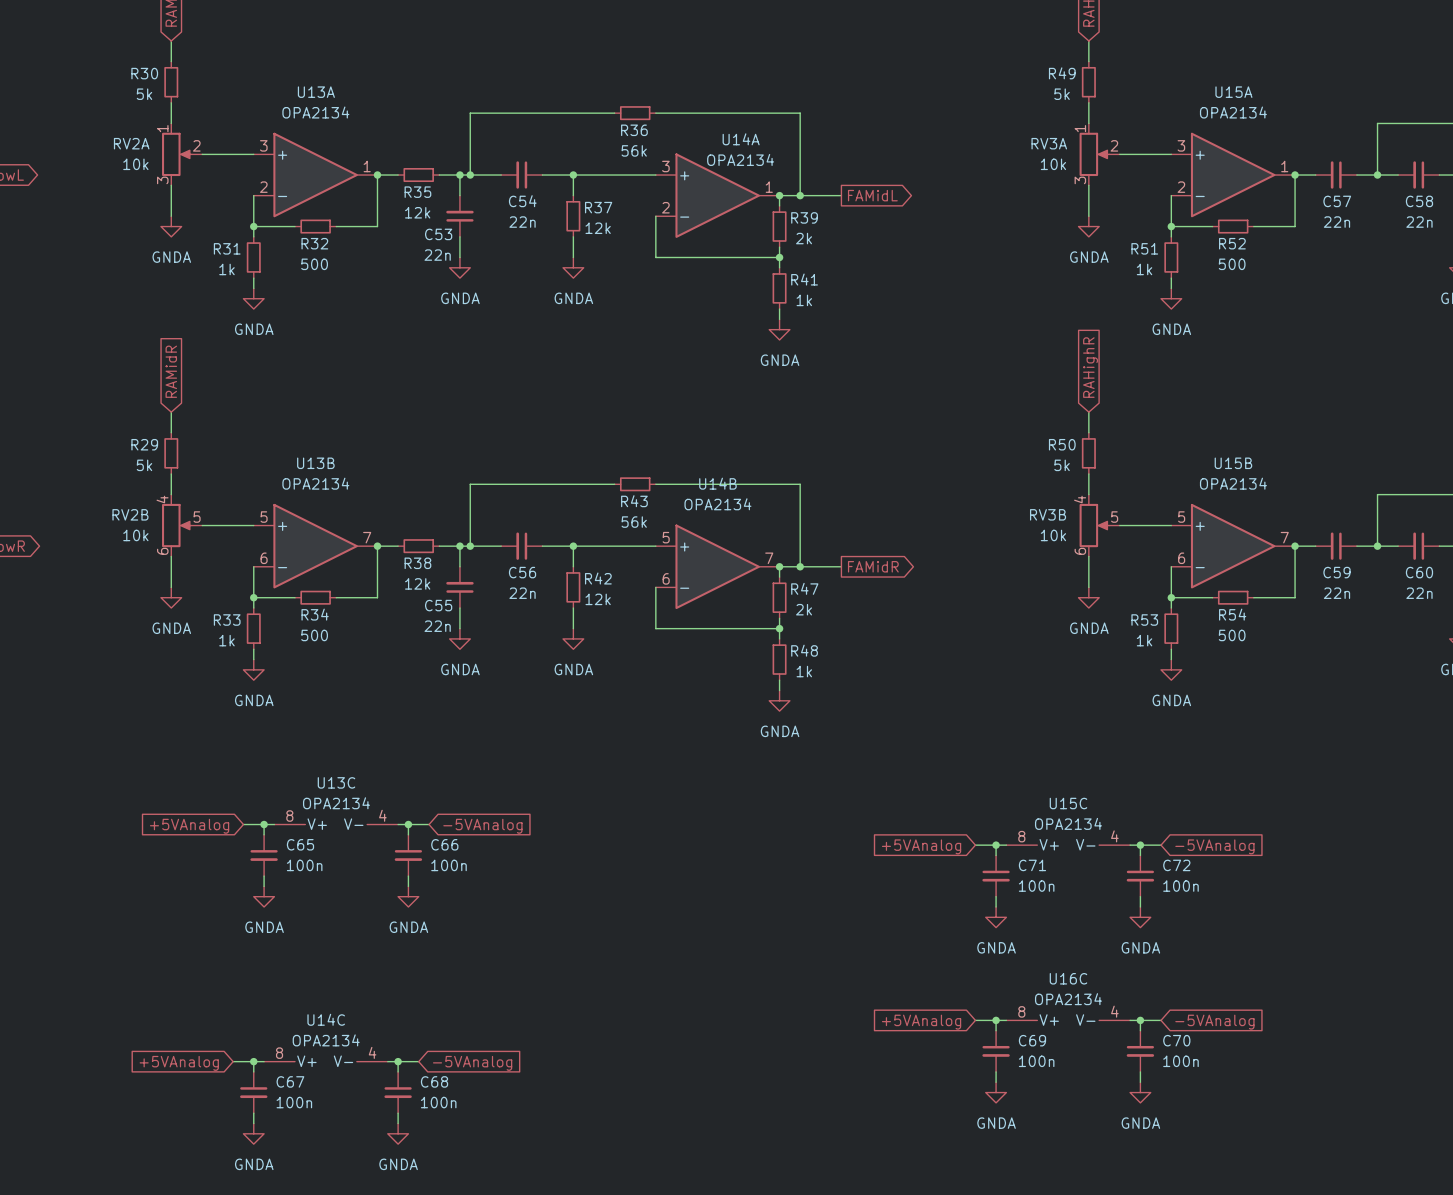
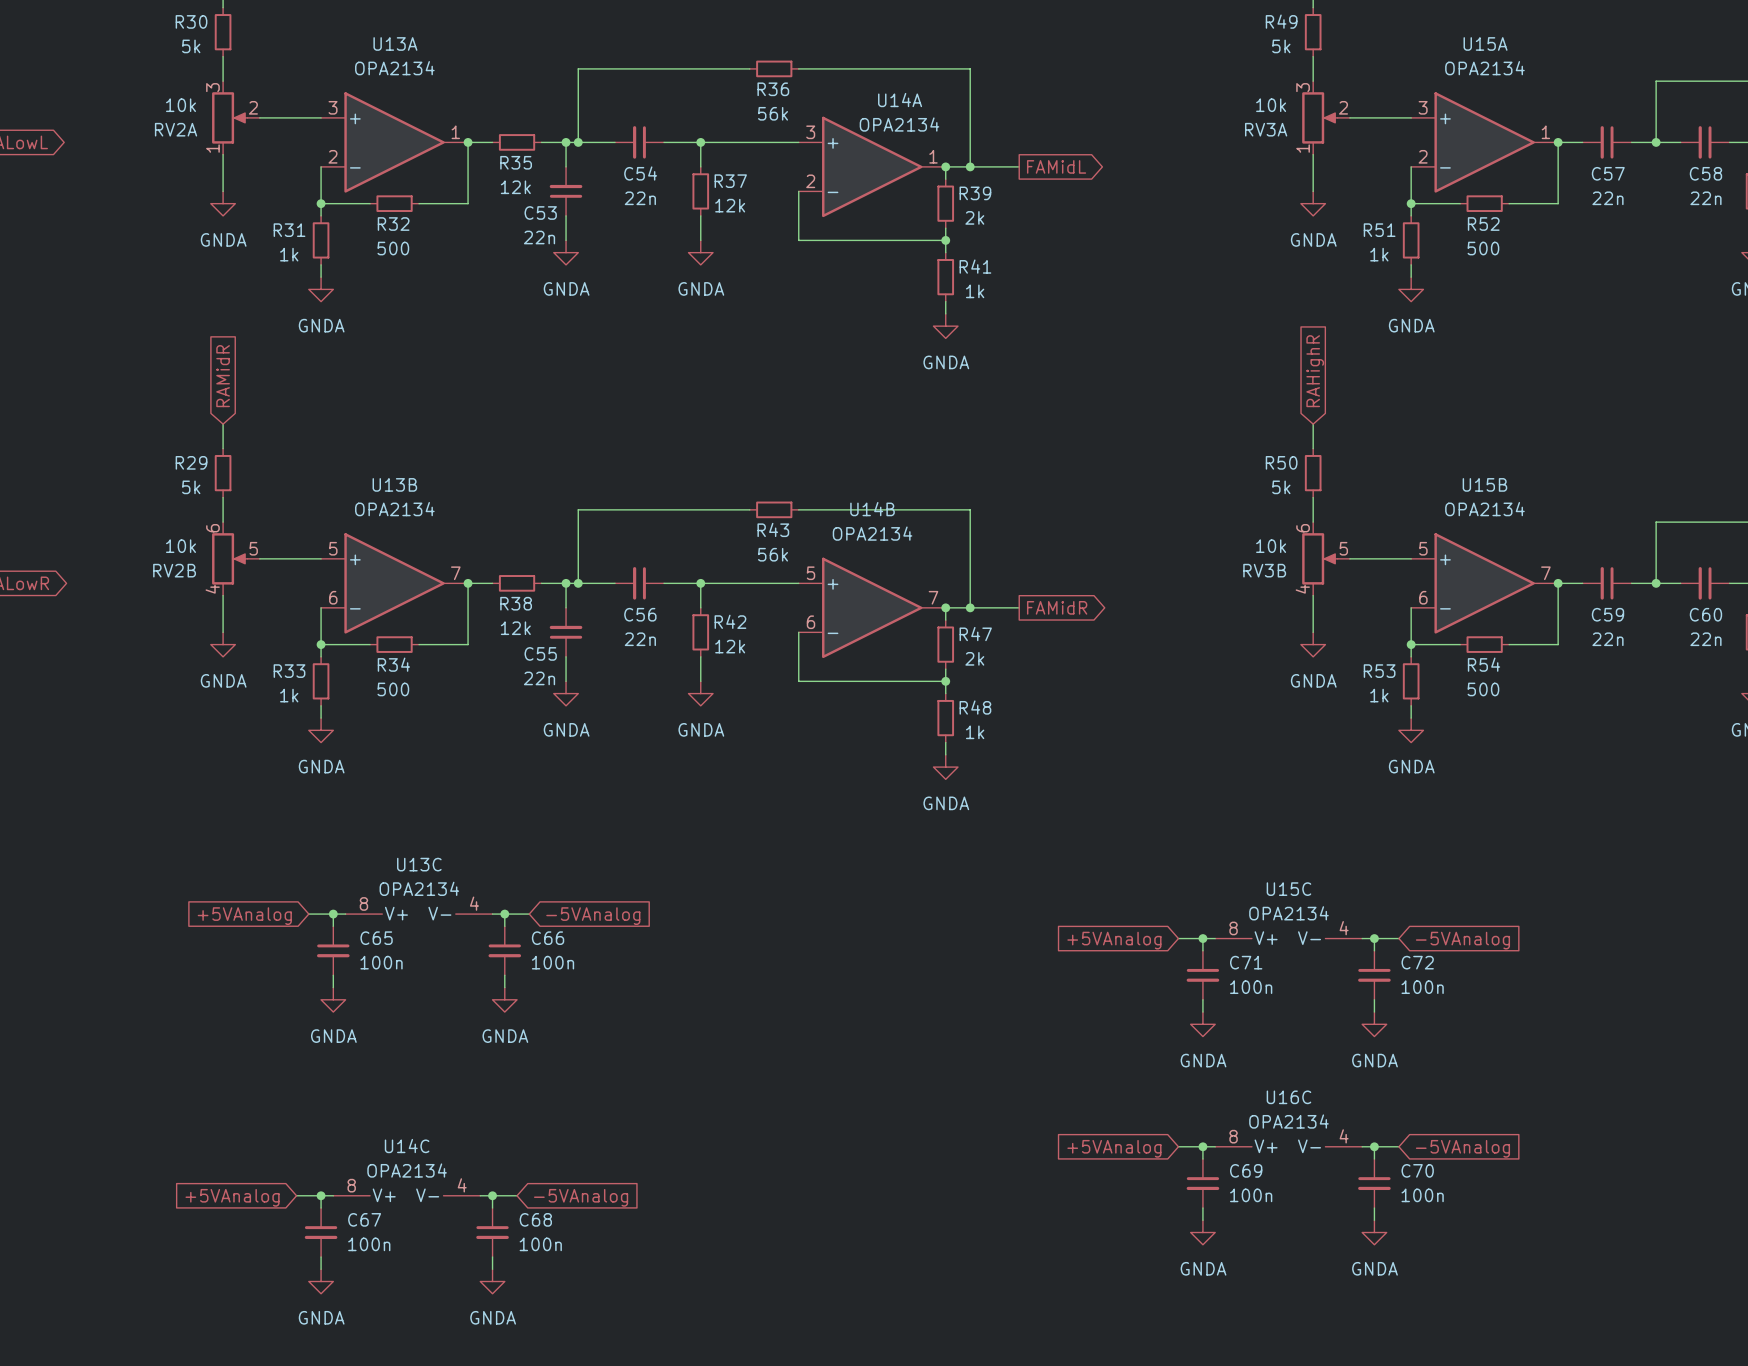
RV2A flip: as is (176, 154) -> up-down (229, 117)
RV3A flip: as is (1094, 154) -> up-down (1319, 117)
RV2B flip: as is (176, 525) -> up-down (229, 558)
RV3B flip: as is (1094, 525) -> up-down (1319, 558)

